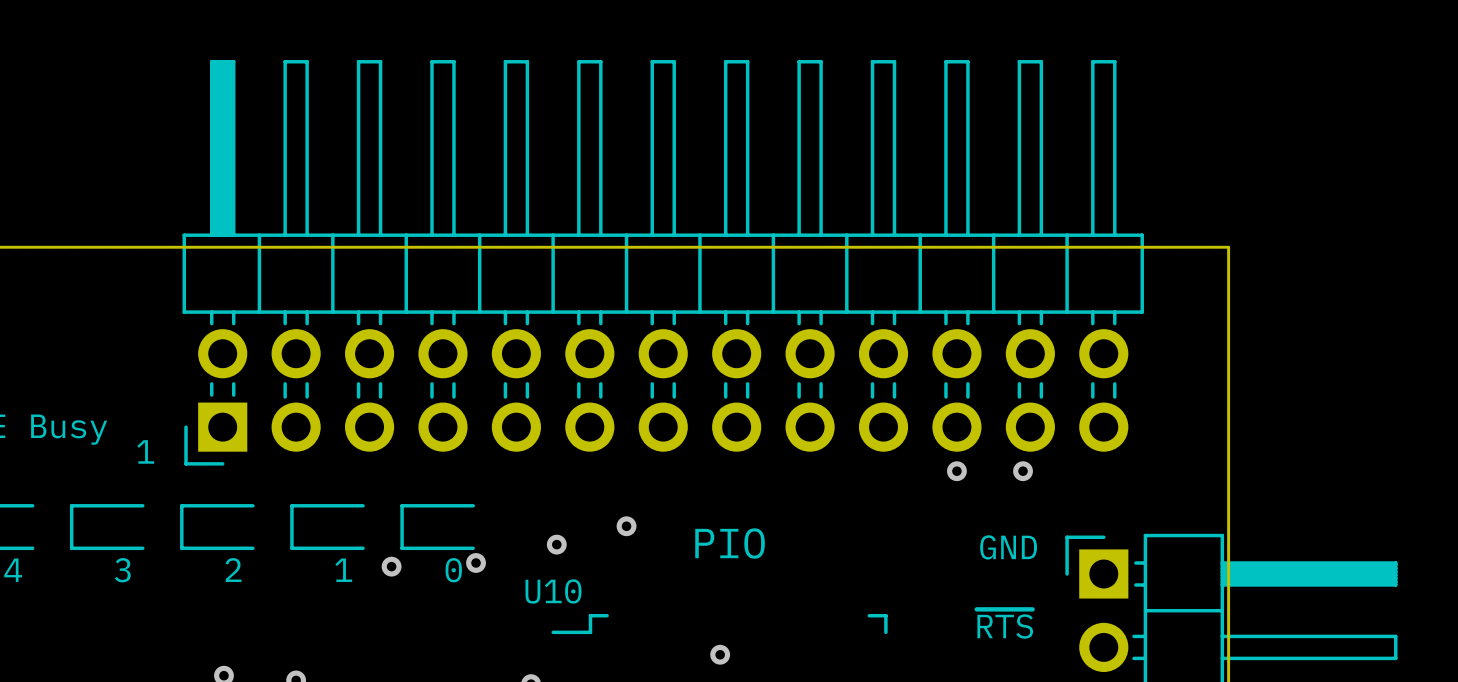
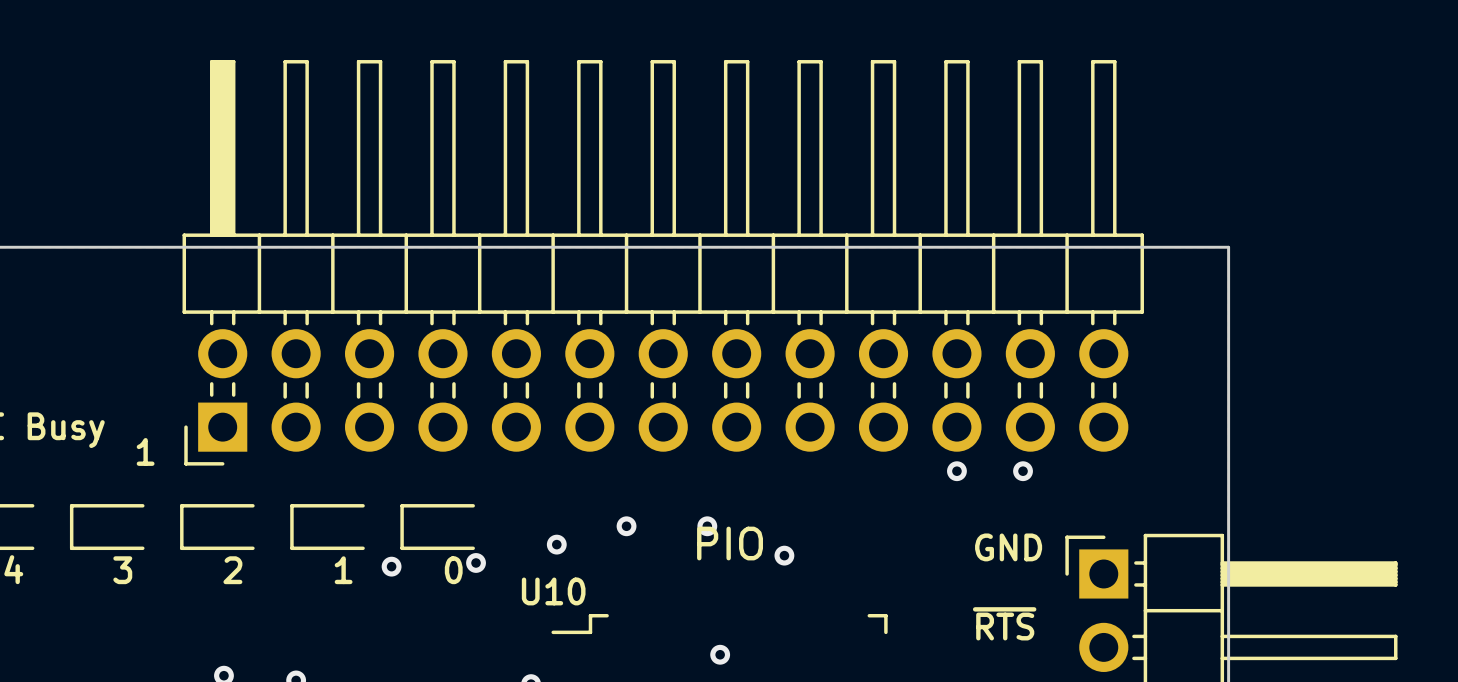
via: none -> (707, 526)
via: none -> (784, 555)

